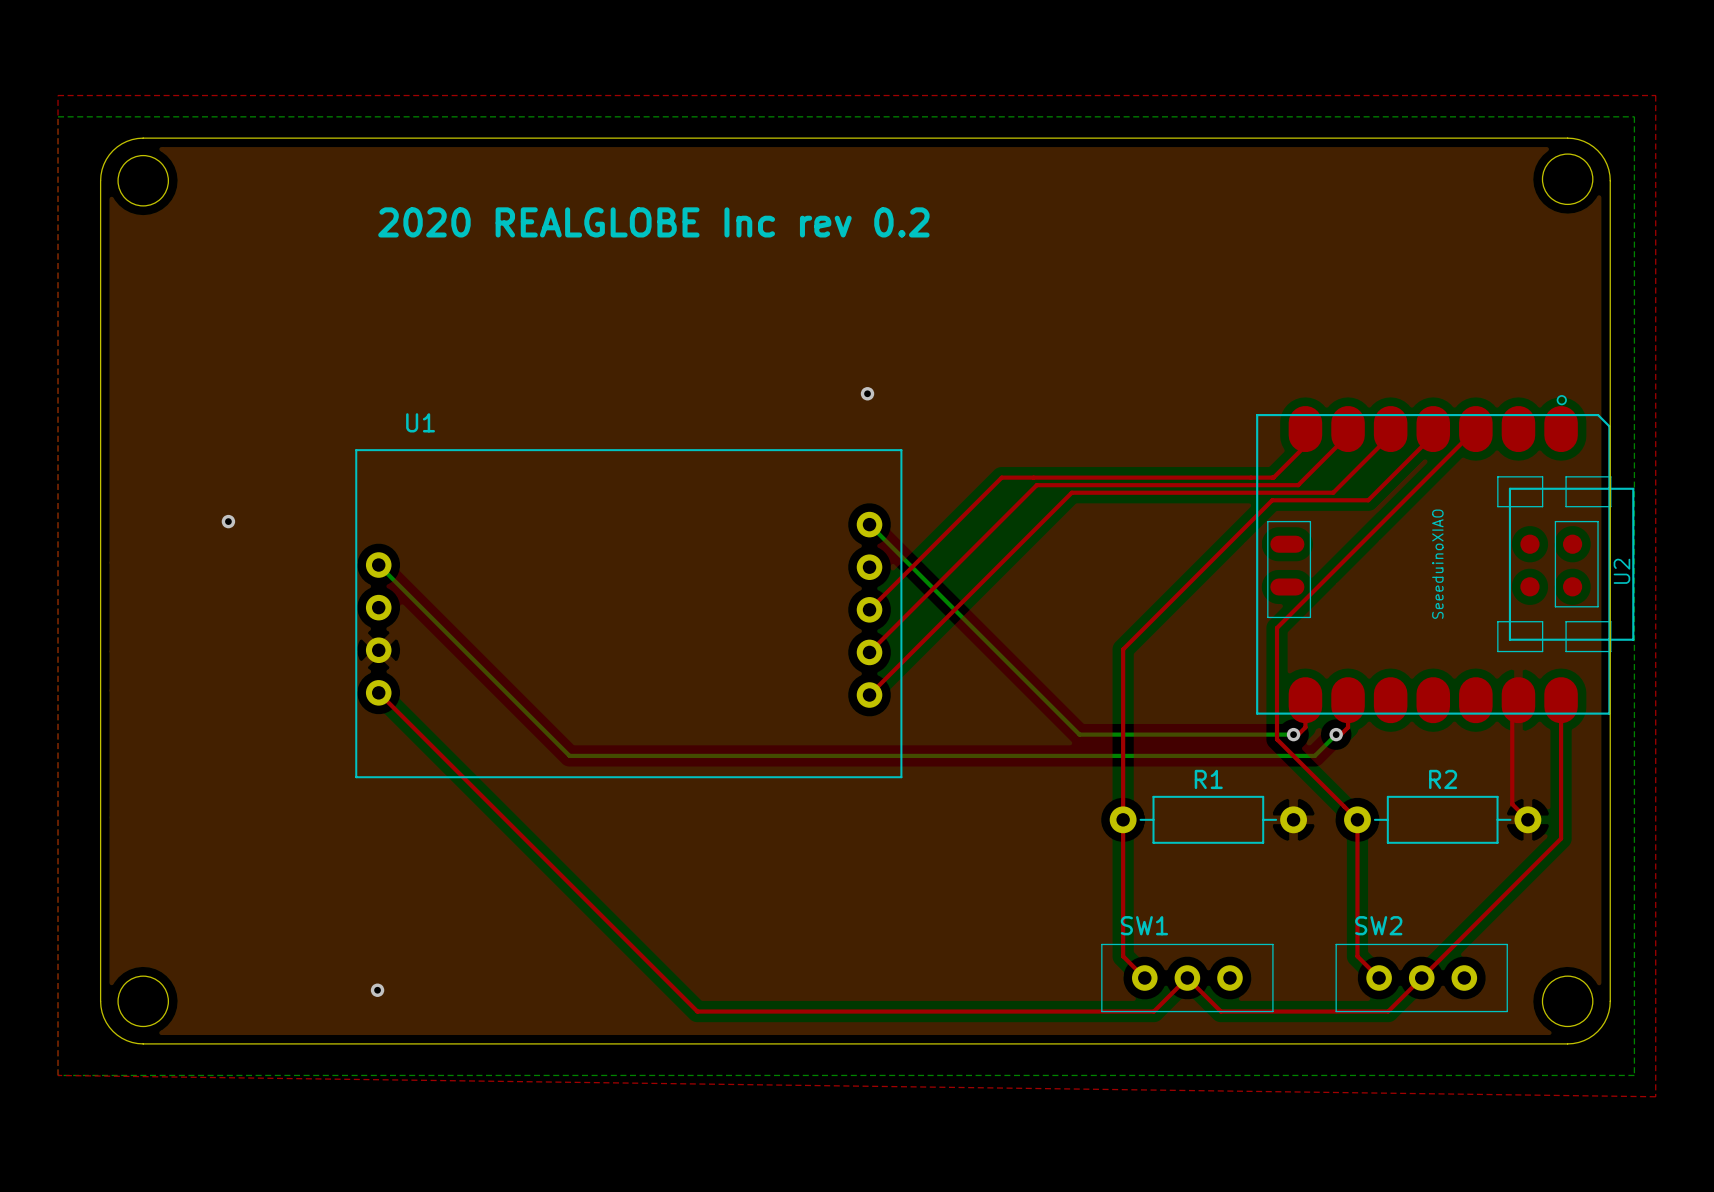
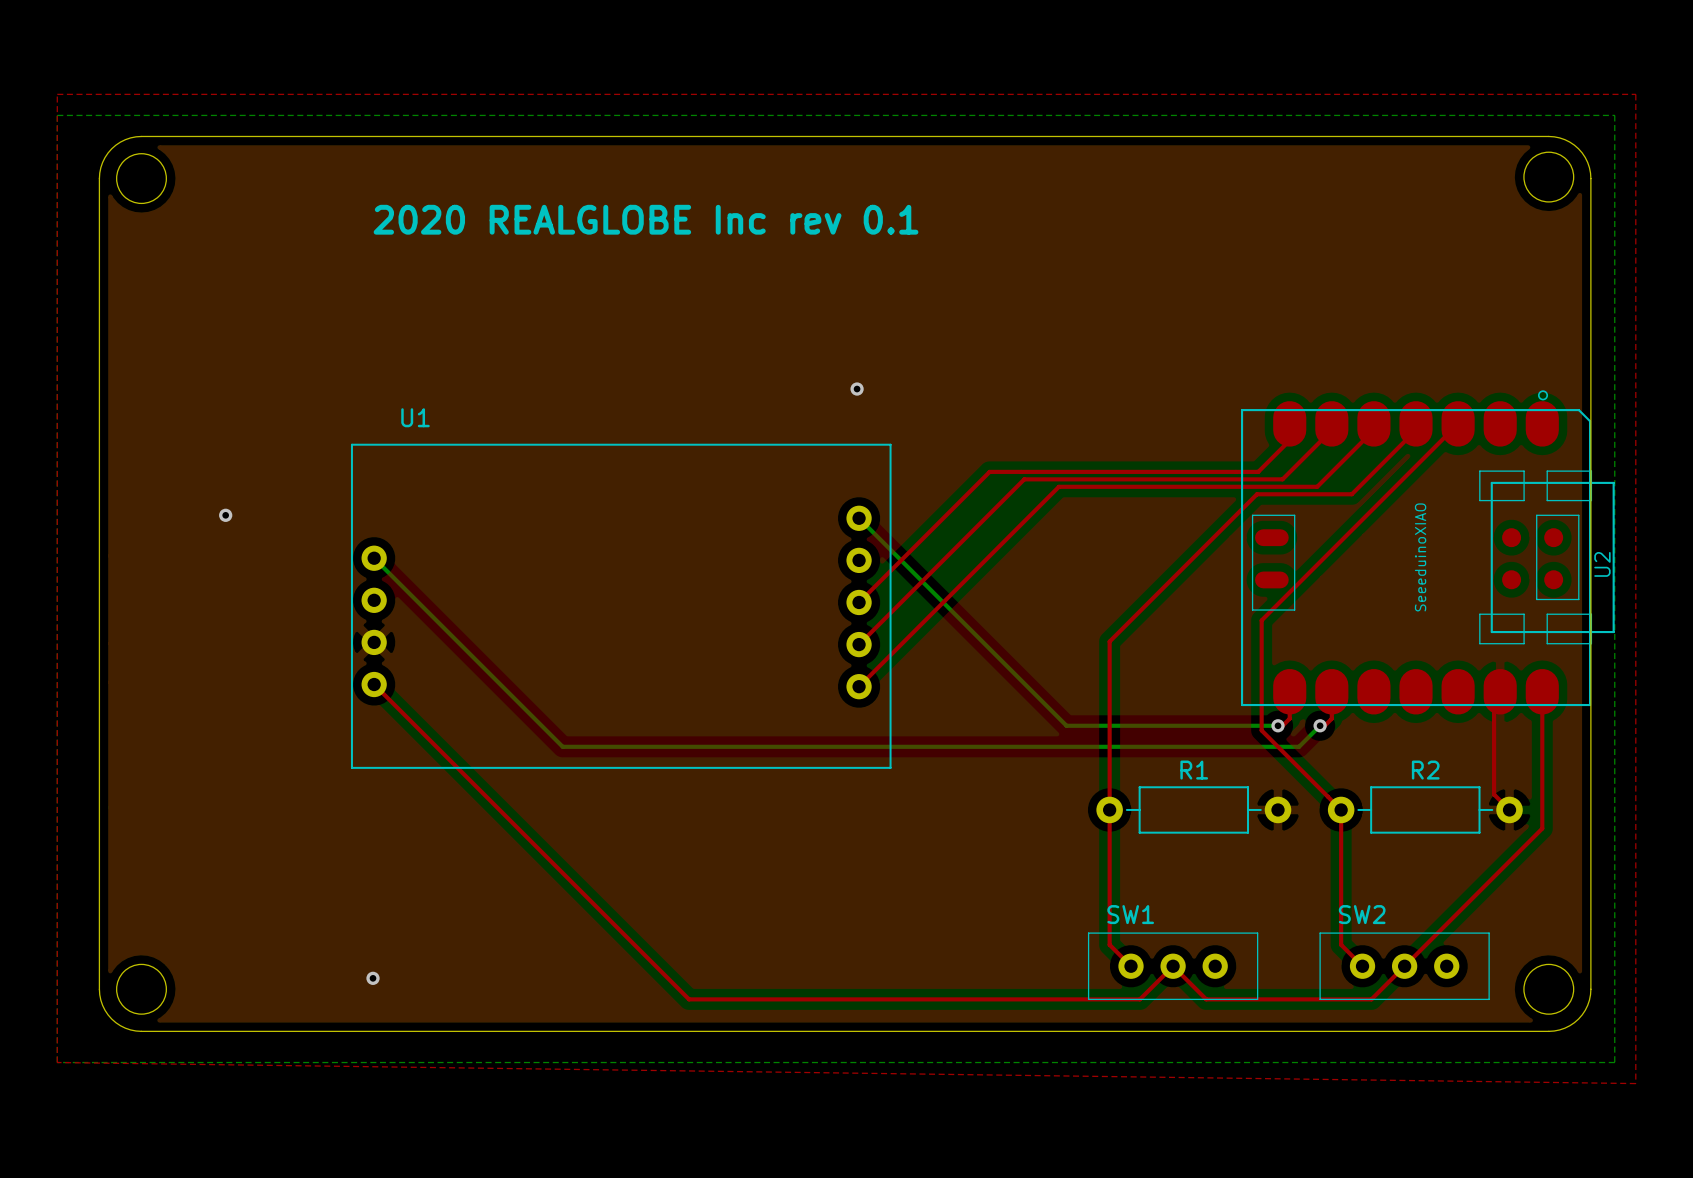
text: 2020 REALGLOBE Inc rev 0.2 (653, 222) -> 2020 REALGLOBE Inc rev 0.1 (646, 219)

